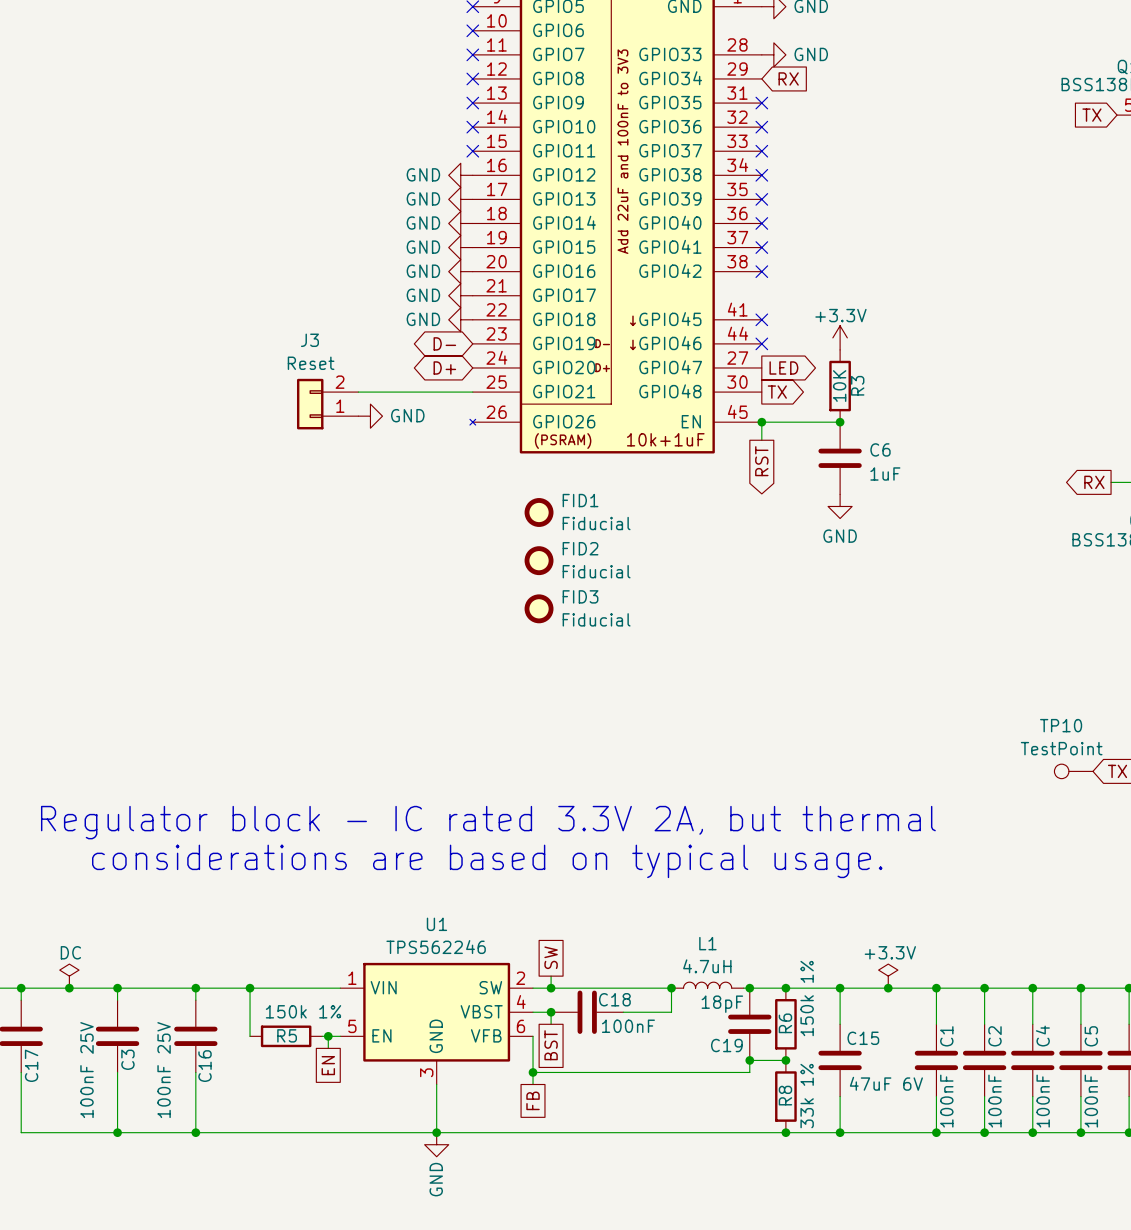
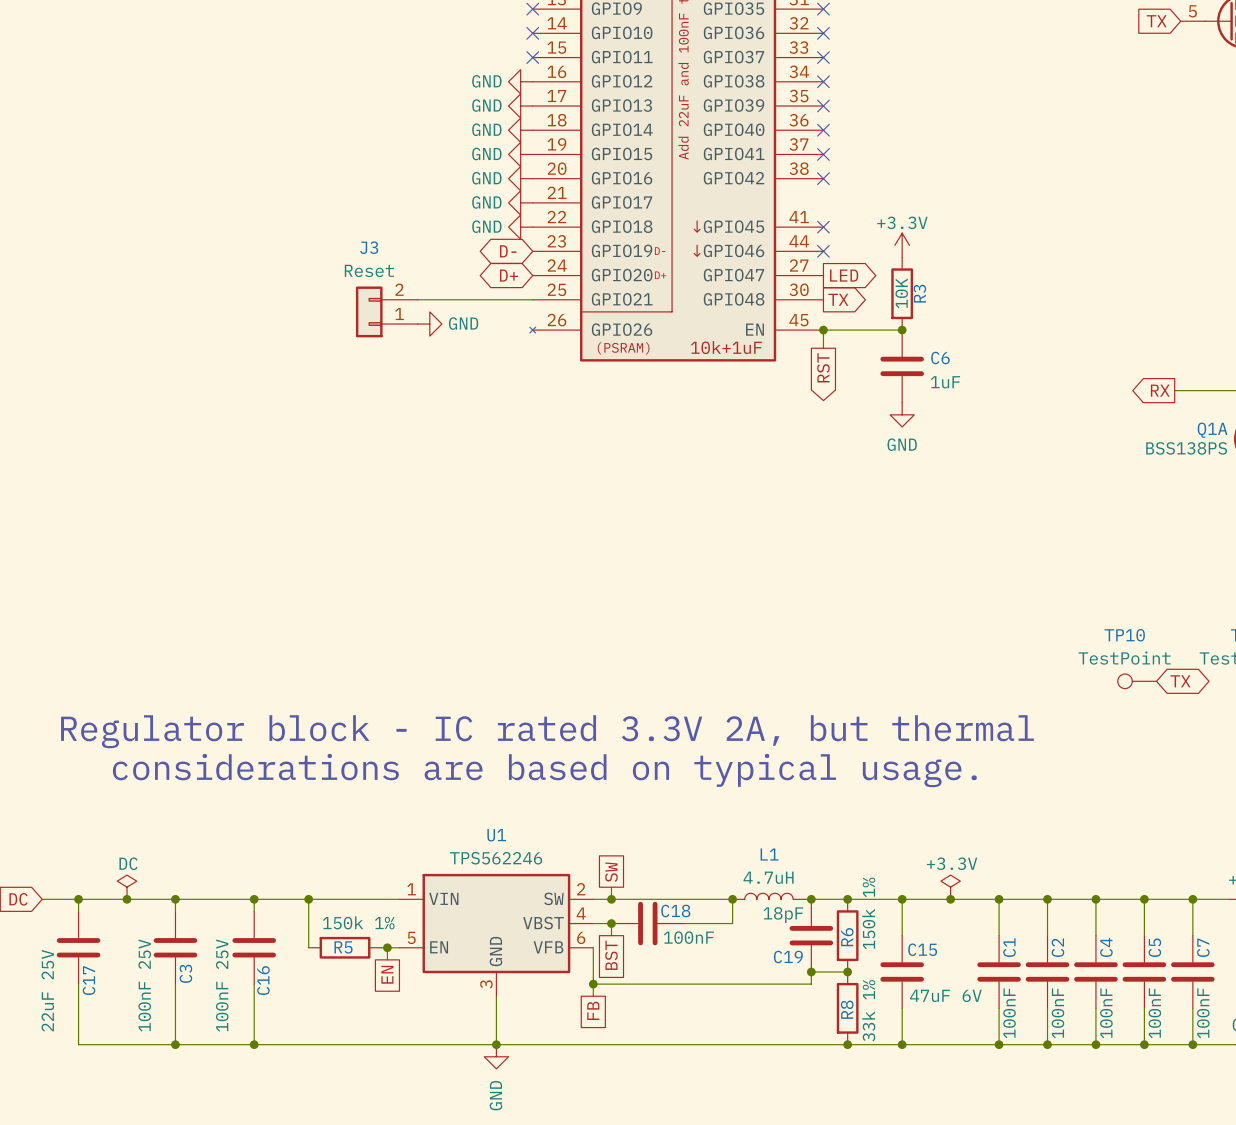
FID1: Fiducial (539, 512) -> none
FID2: Fiducial (539, 560) -> none
FID3: Fiducial (539, 608) -> none

